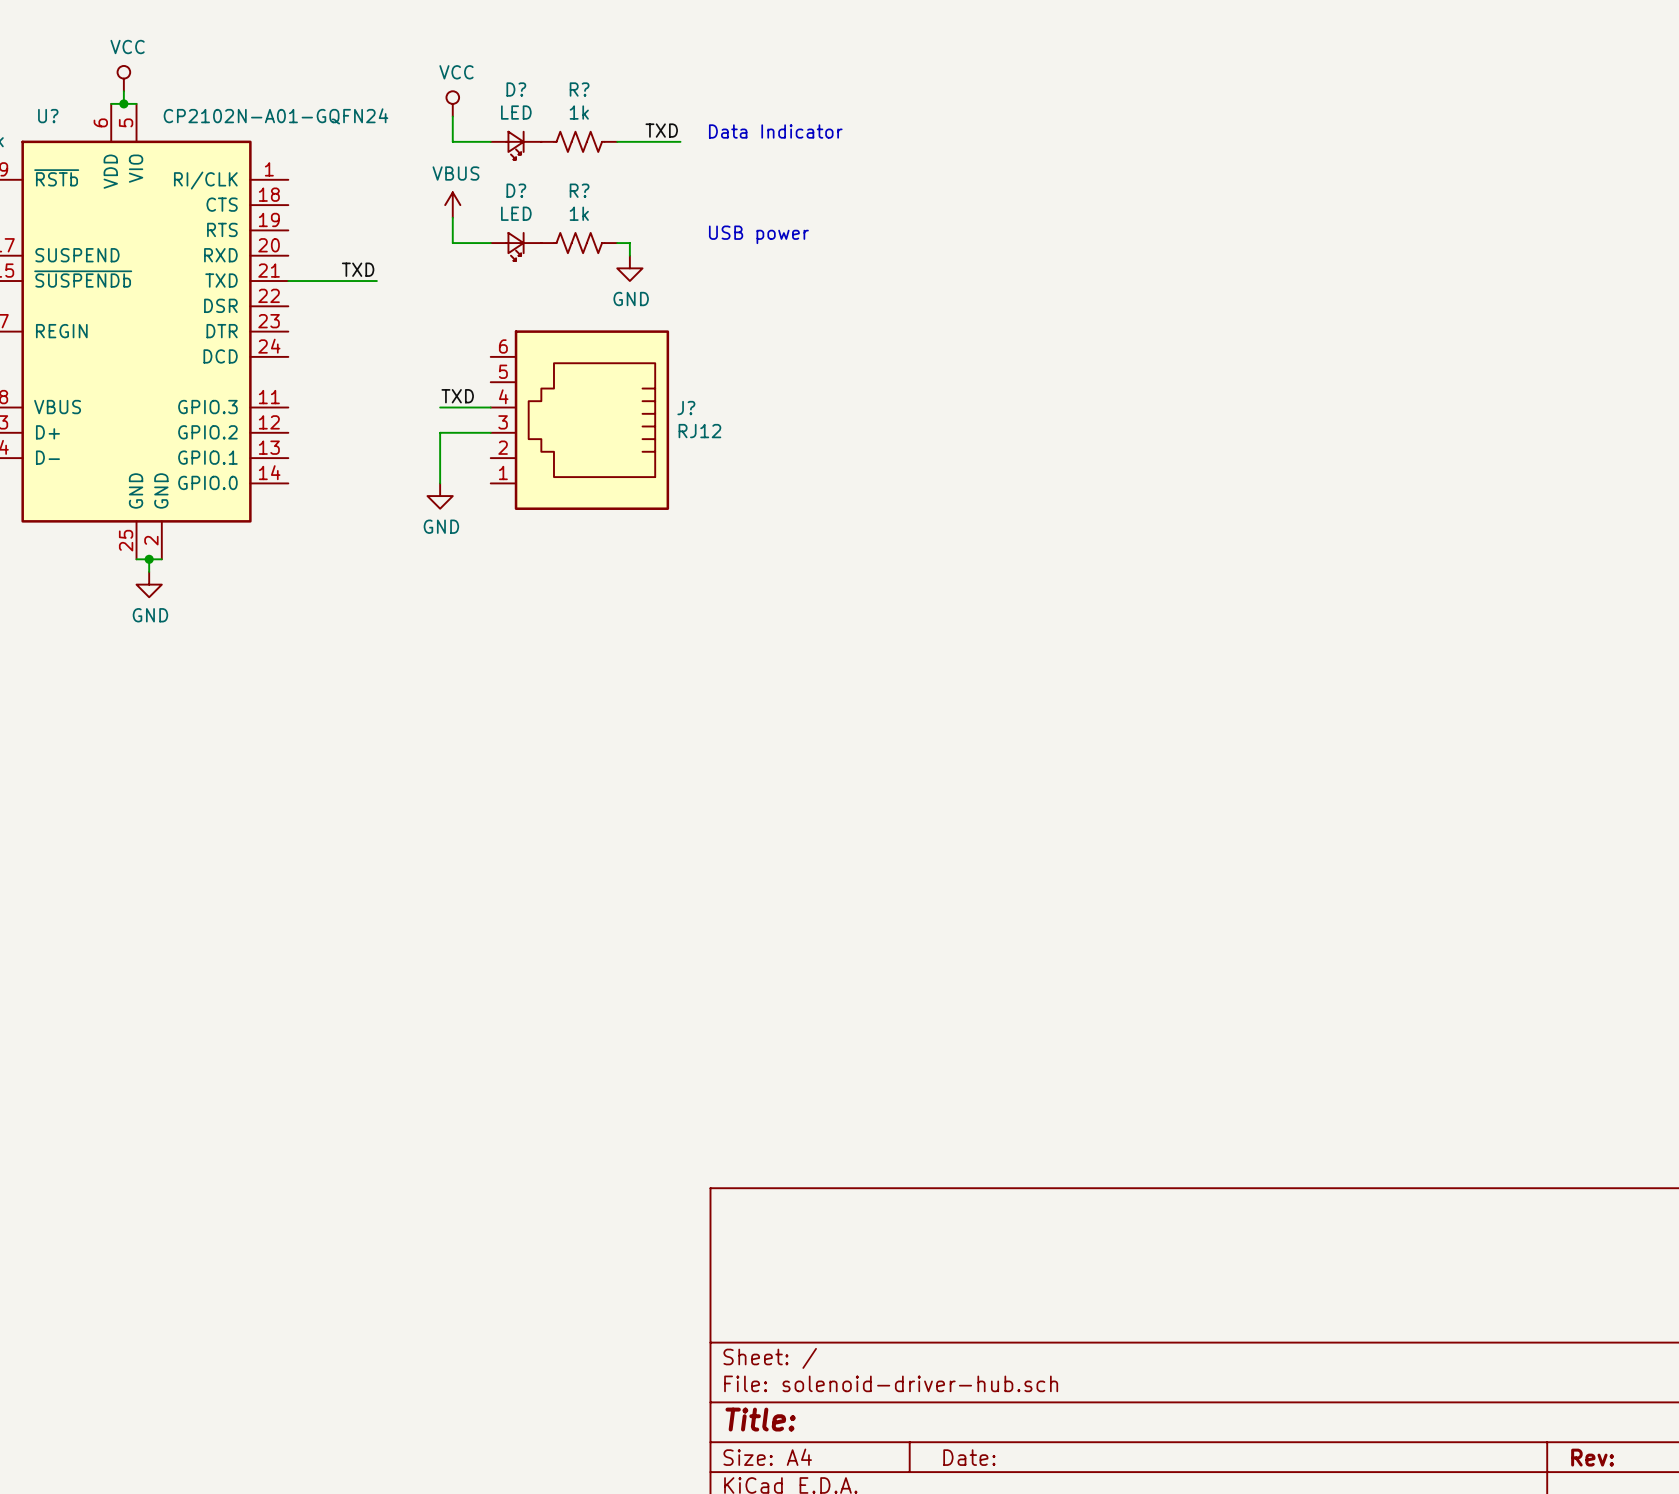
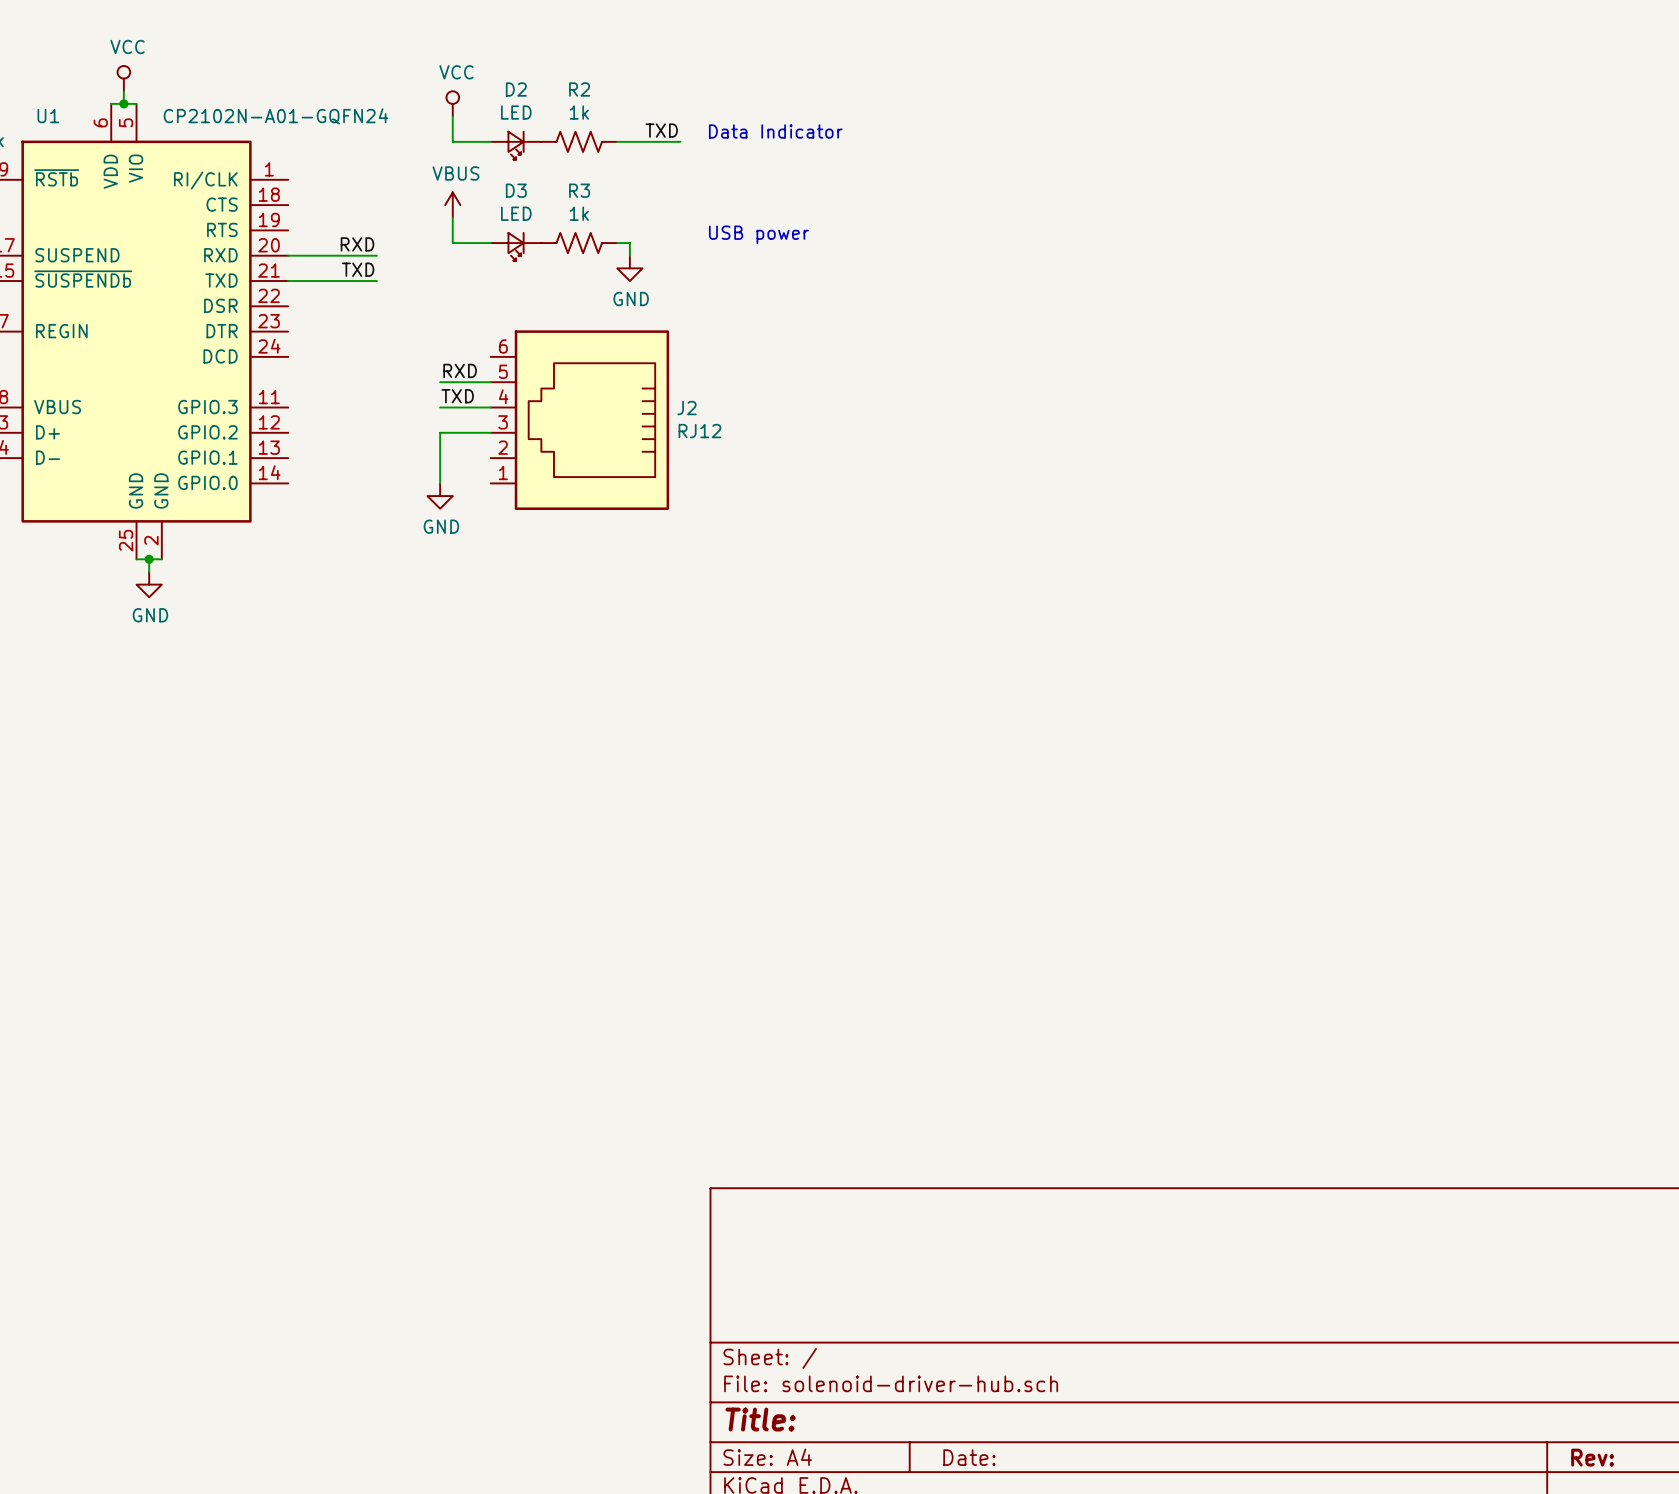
D? name: D? (516, 89) -> D2 (516, 89)
R? name: R? (579, 89) -> R2 (579, 89)
U? name: U? (48, 116) -> U1 (48, 116)
D? name: D? (516, 190) -> D3 (516, 190)
R? name: R? (579, 190) -> R3 (579, 190)
label: none -> RXD (357, 244)
wire: none -> (288, 255) (376, 255)
label: none -> RXD (460, 370)
wire: none -> (440, 382) (490, 382)
J? name: J? (686, 408) -> J2 (686, 408)

